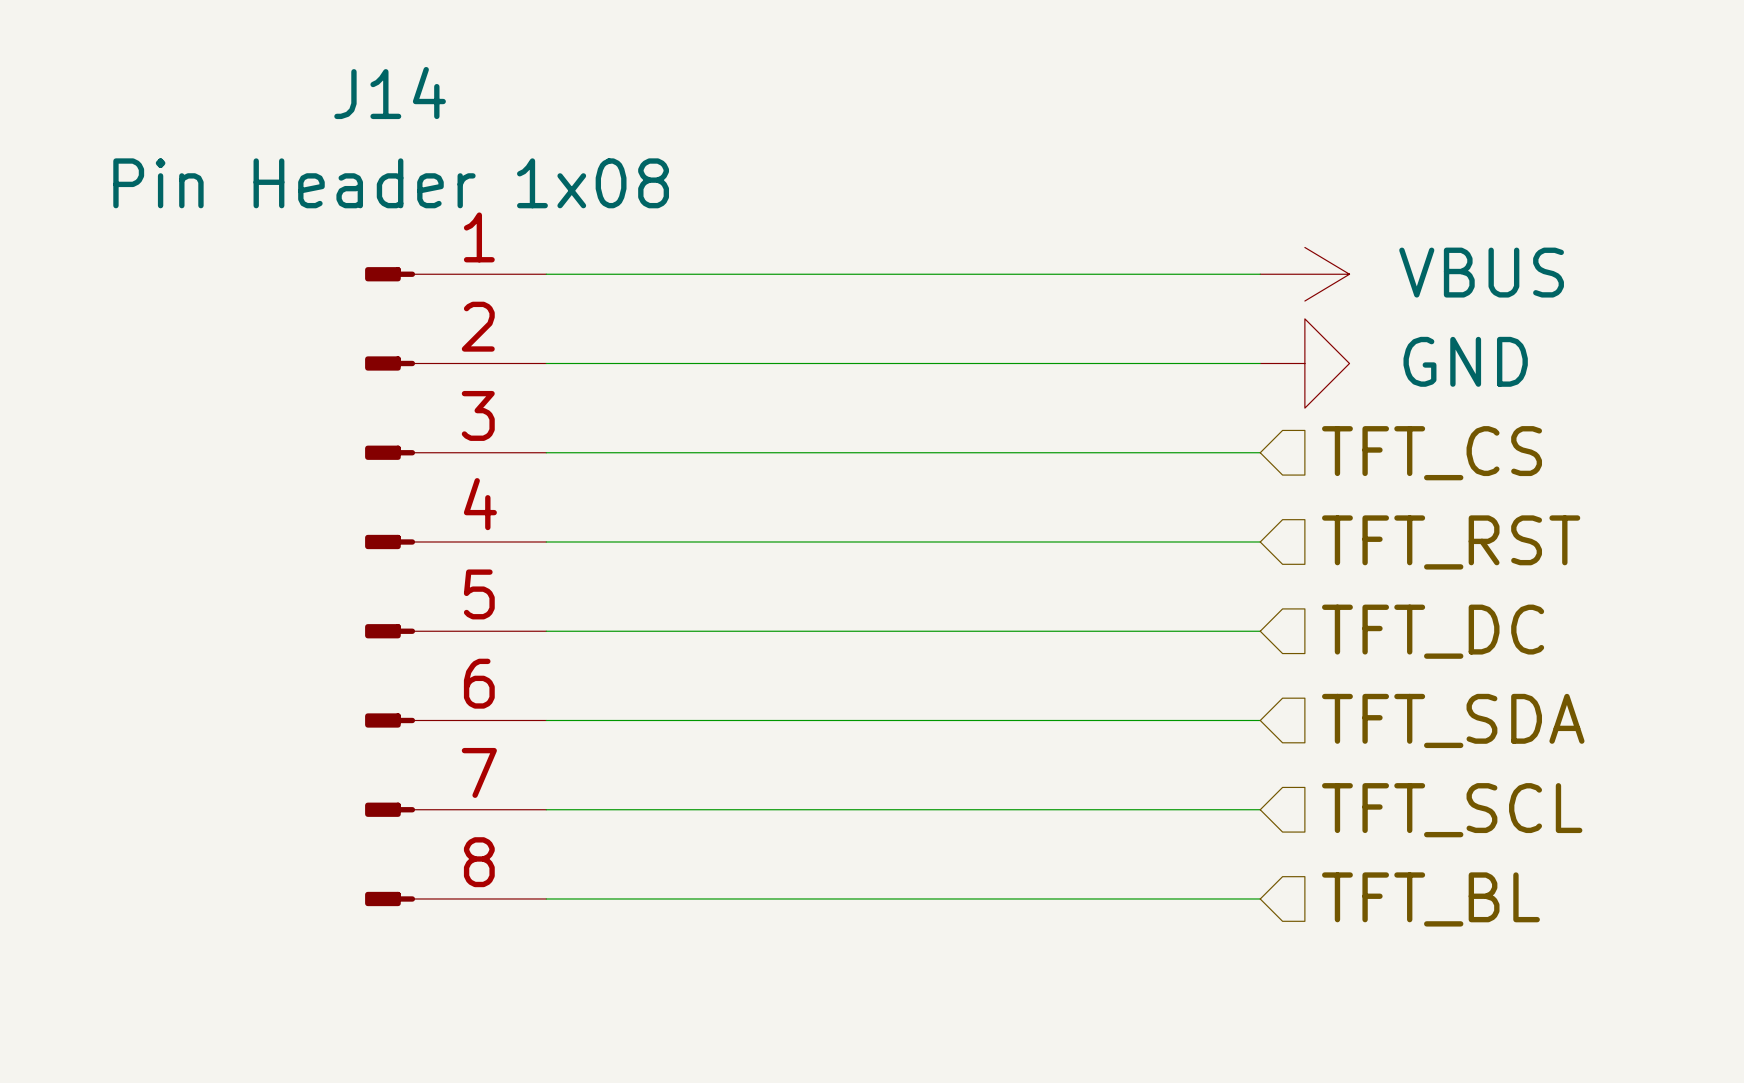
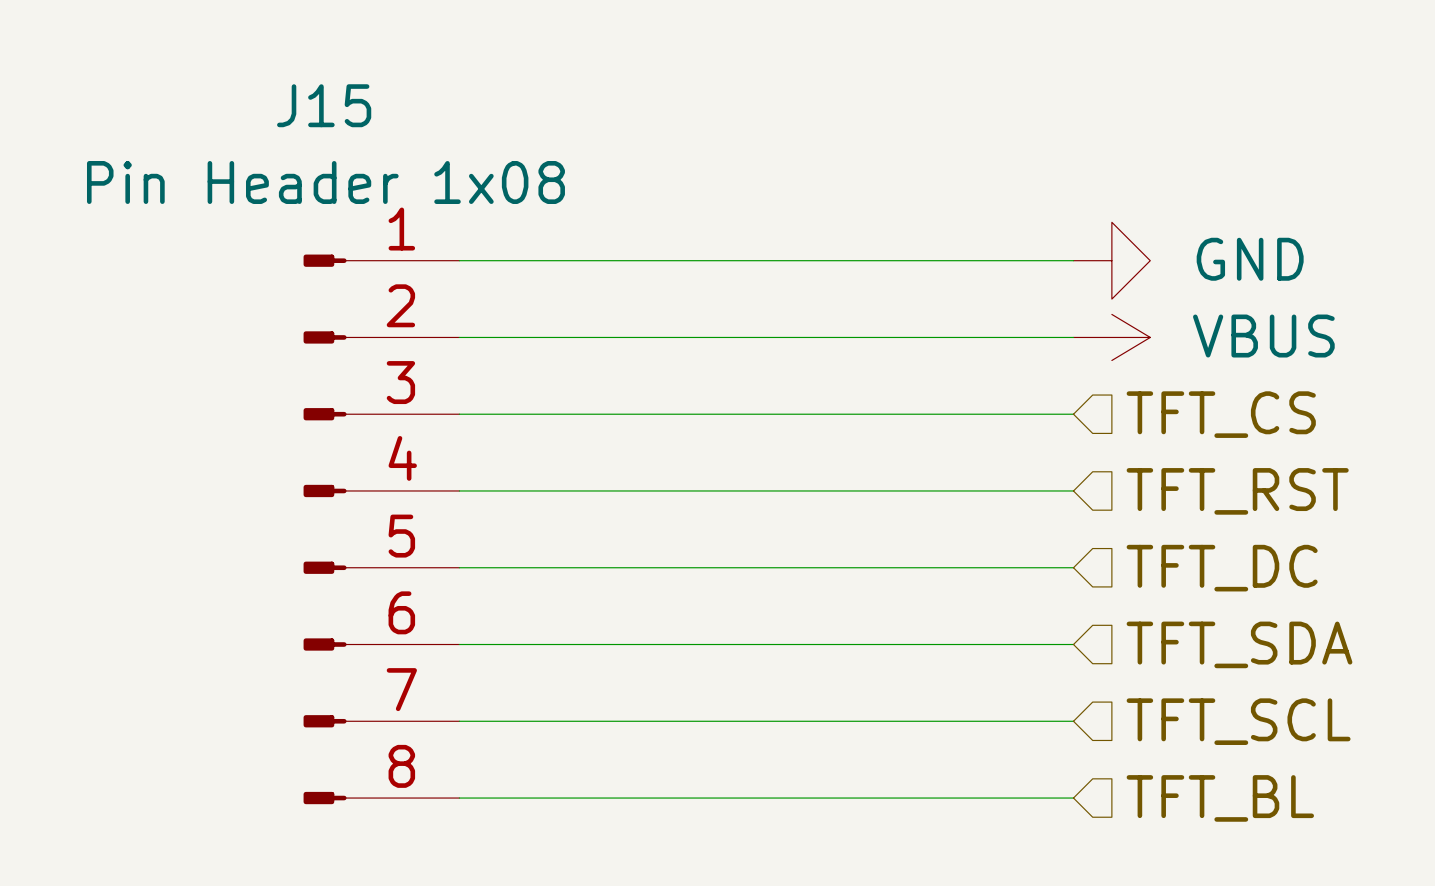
J14 name: J14 (390, 93) -> J15 (324, 105)
power symbol: VBUS (1304, 274) -> GND (1111, 260)
power symbol: GND (1304, 363) -> VBUS (1111, 337)

